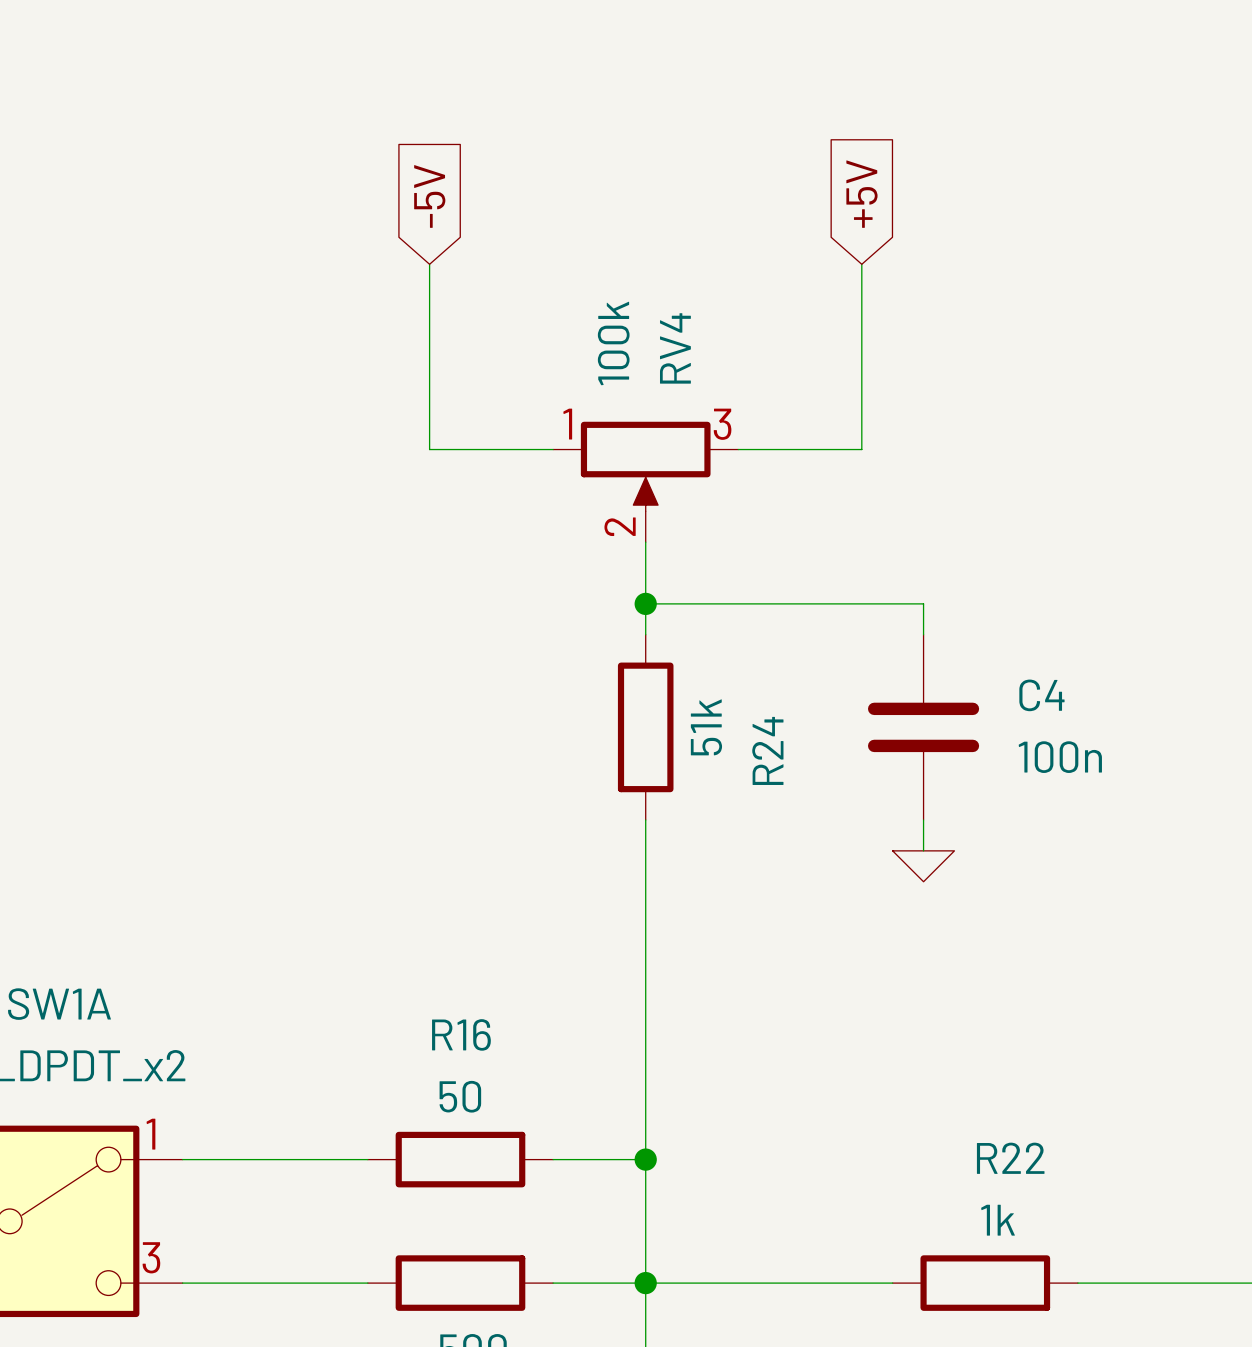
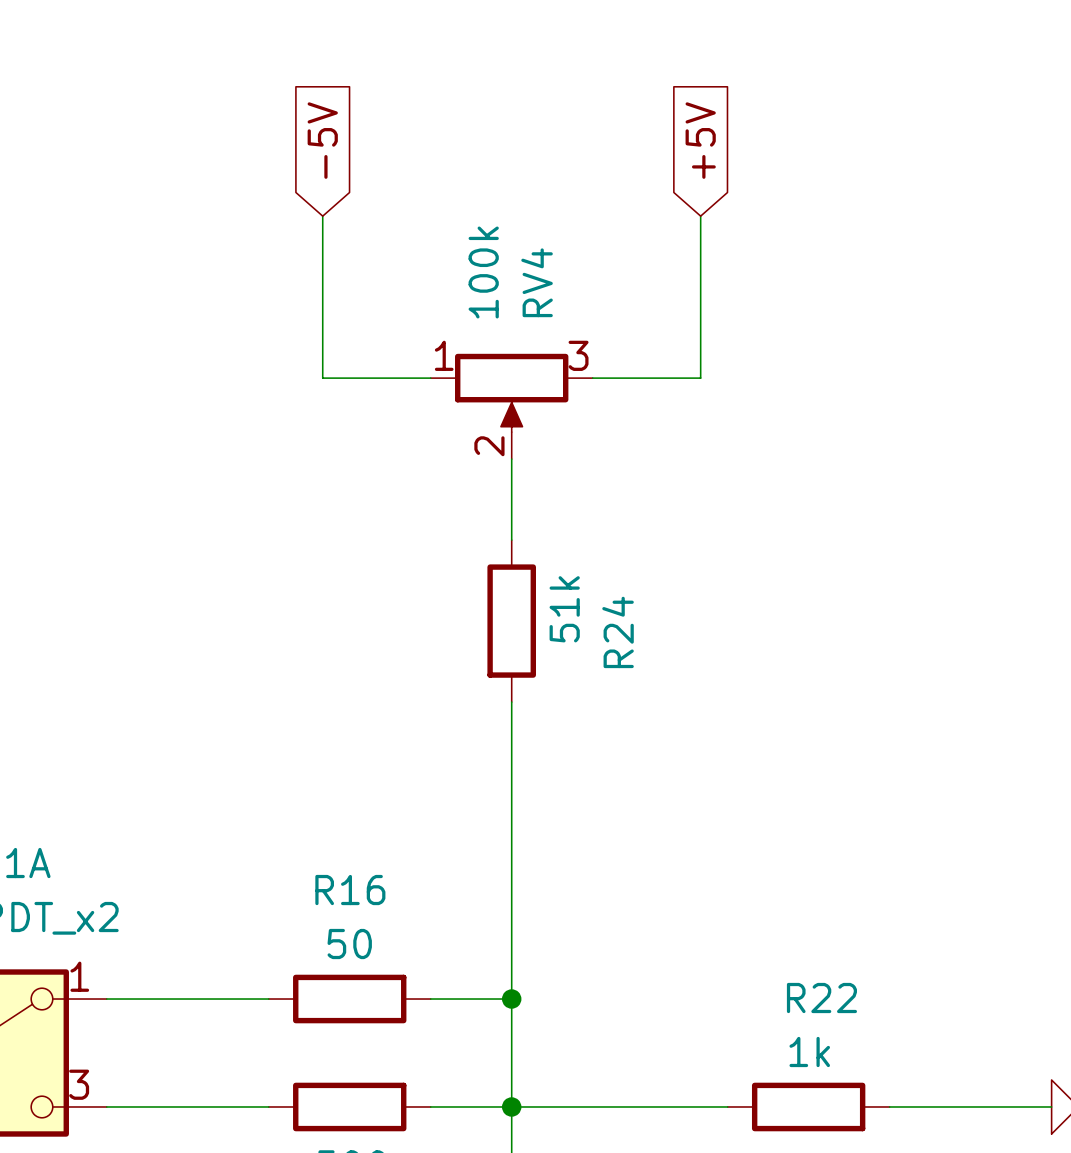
wire: (645, 603) (923, 603) (923, 634) -> none
junction: (645, 603) -> none
C4: 100n (923, 727) -> none
wire: (923, 820) (923, 850) -> none
power symbol: (923, 866) -> none

